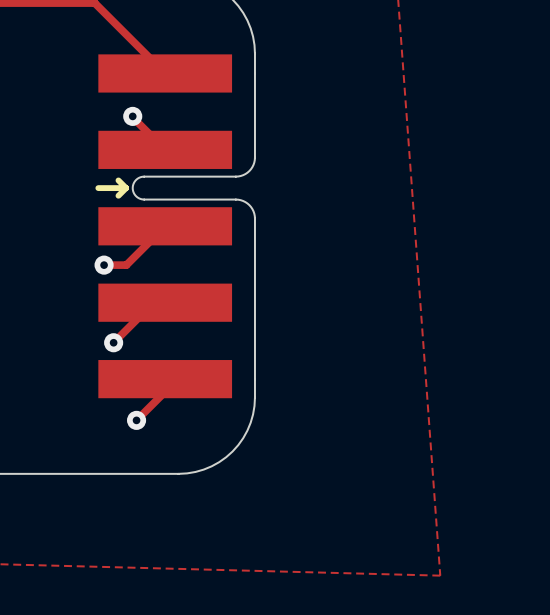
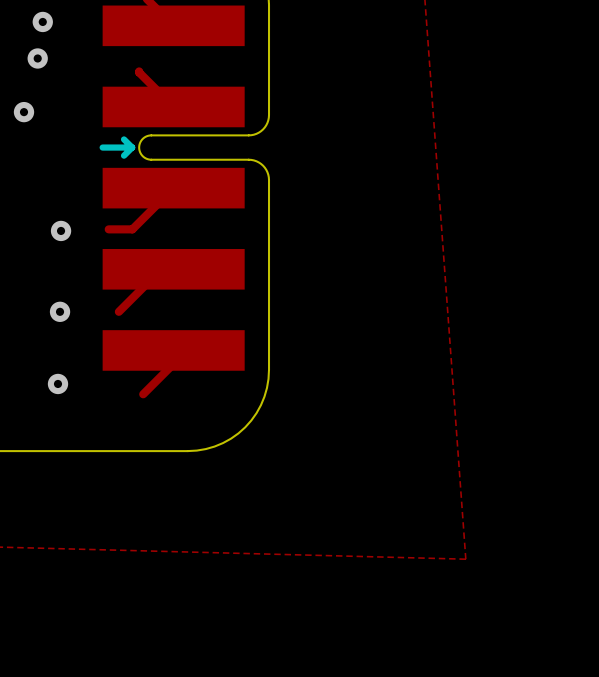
via: none -> (42, 21)
via: none -> (37, 58)
via: (132, 116) -> none
via: none -> (24, 112)
via: (104, 265) -> none
via: none -> (61, 230)
via: none -> (60, 311)
via: (113, 342) -> none
via: none -> (58, 383)
via: (136, 420) -> none

